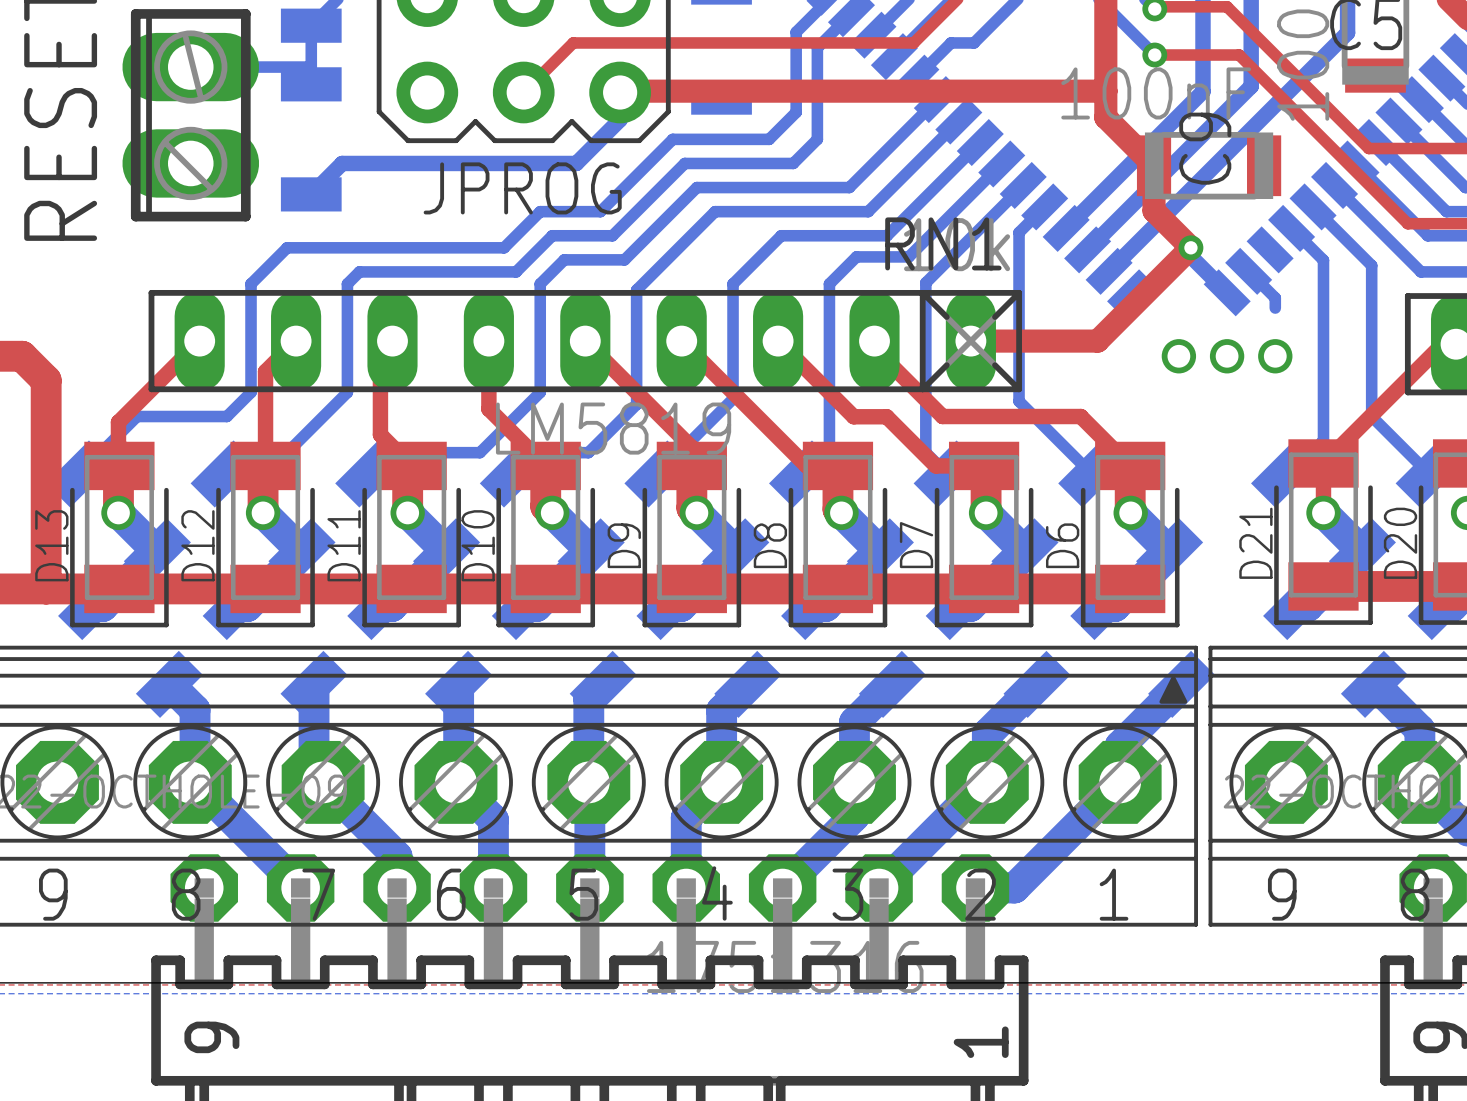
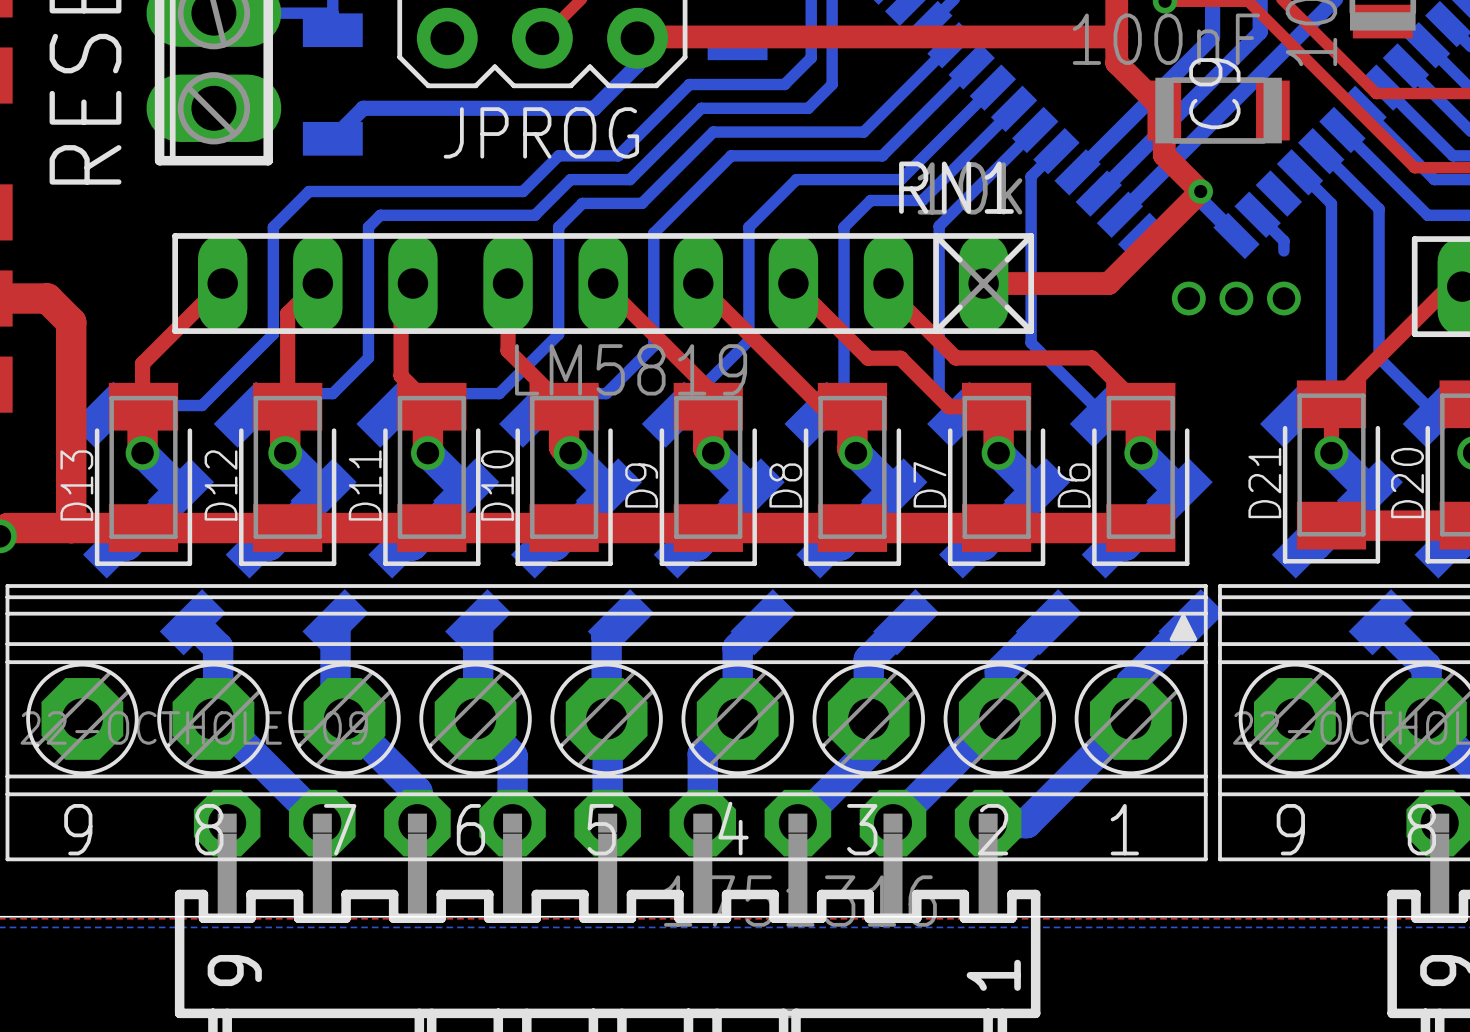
bottom track: (347, 392) (287, 452) -> (368, 334) (368, 357) (332, 393) (309, 393)
bottom track: (226, 416) (137, 416) (88, 464) -> (249, 357) (202, 405) (113, 405)

